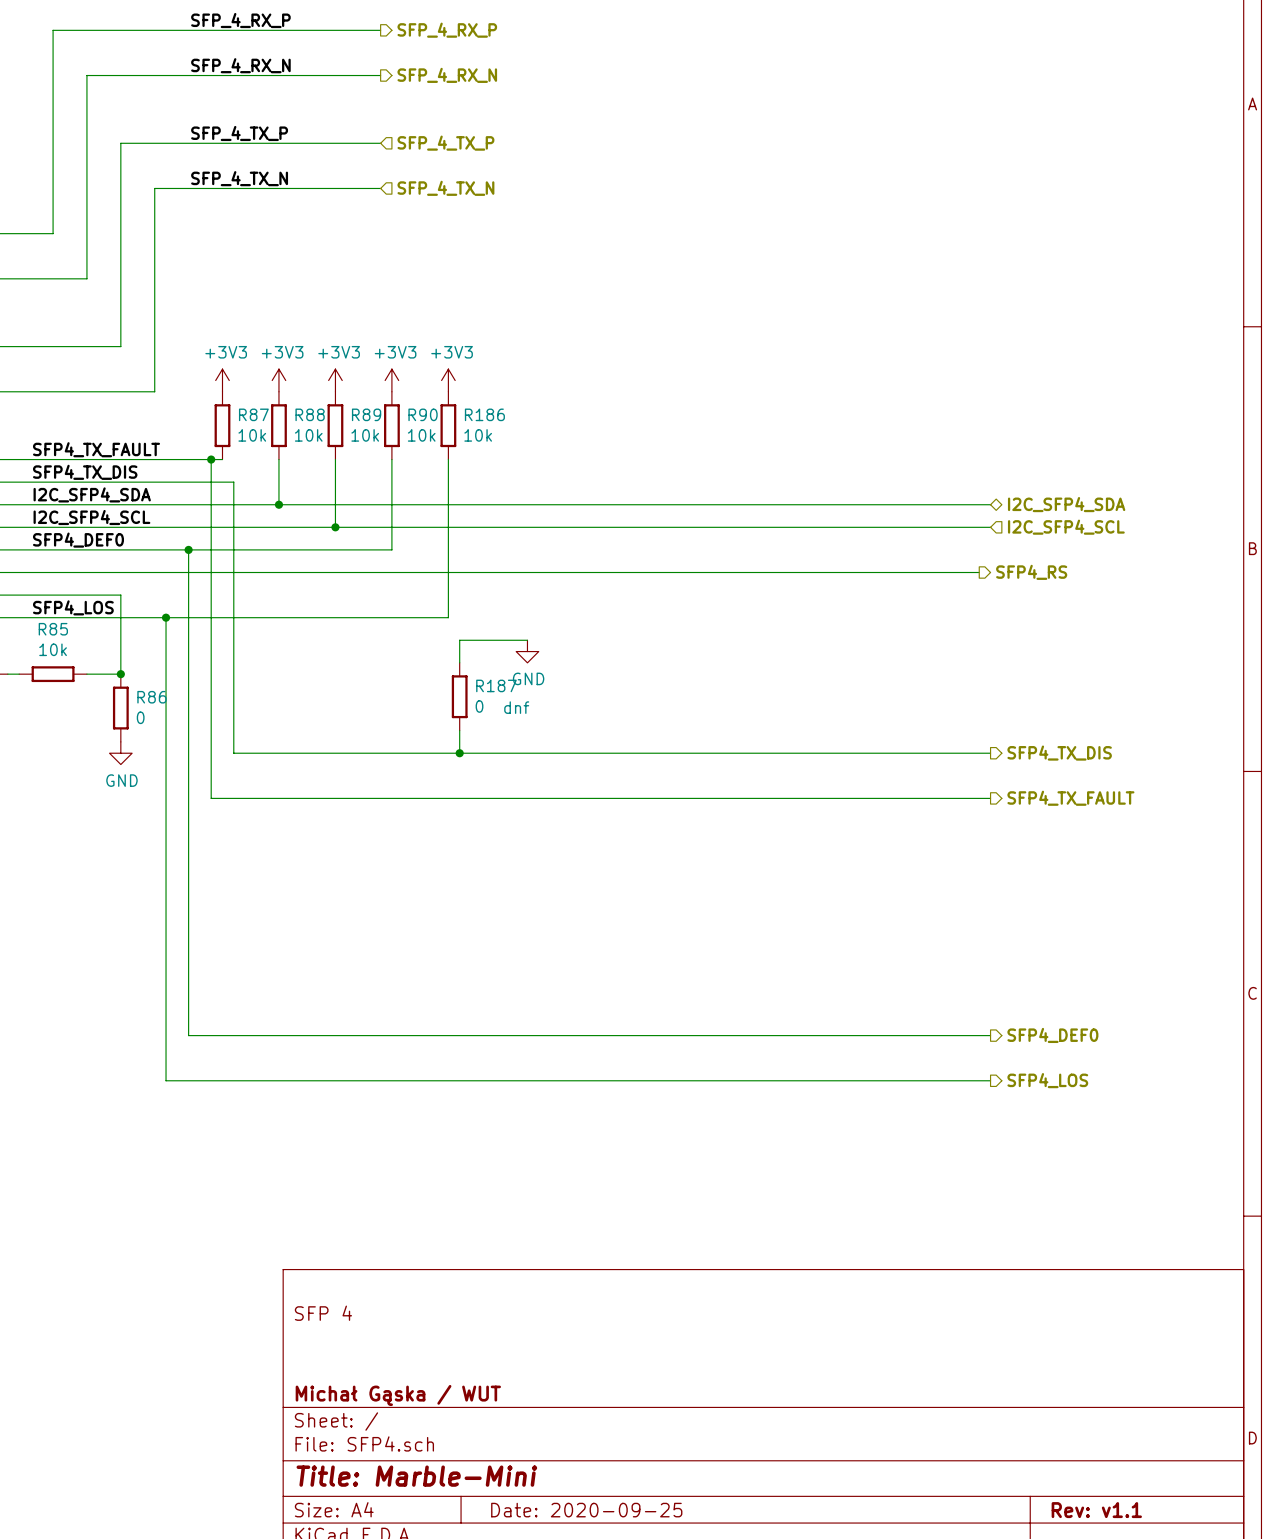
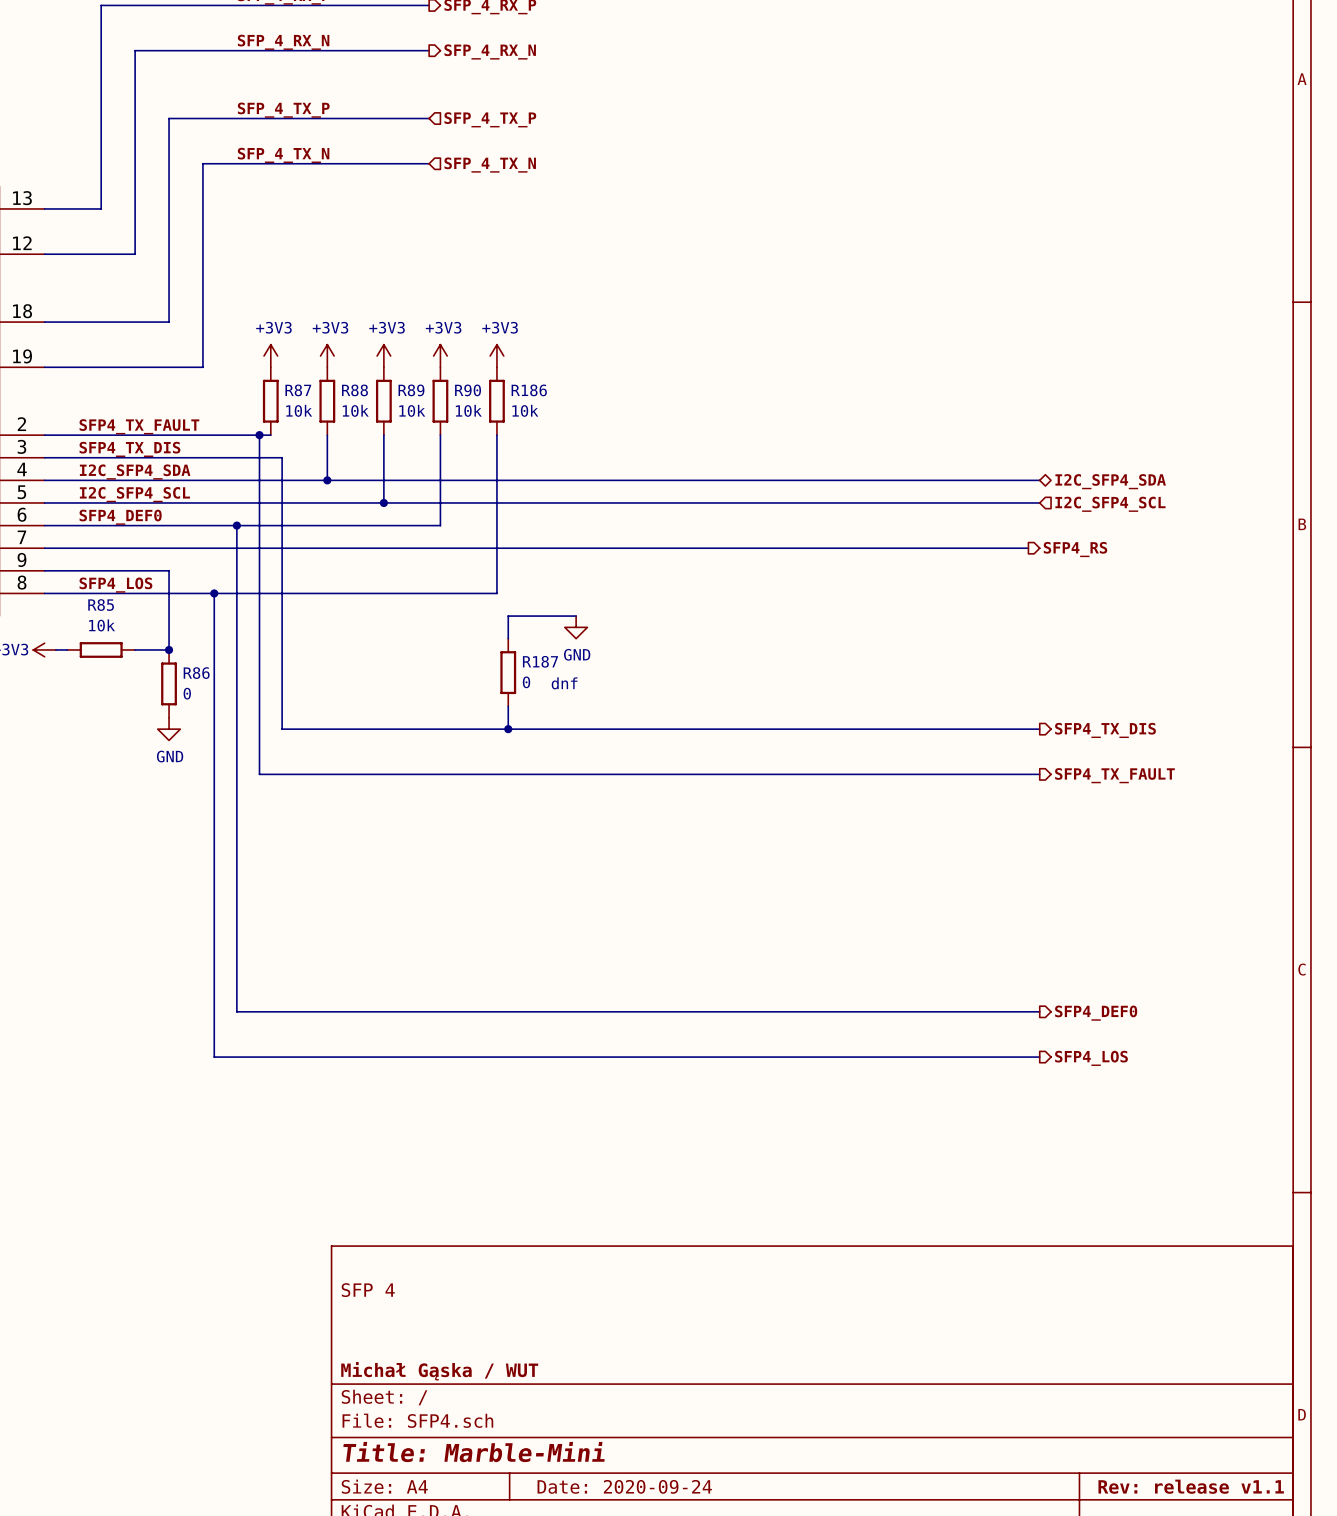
title block: Date: 2020-09-25 (586, 1510) -> Date: 2020-09-24 (624, 1486)
title block: Rev: v1.1 (1096, 1510) -> Rev: release v1.1 (1191, 1486)

